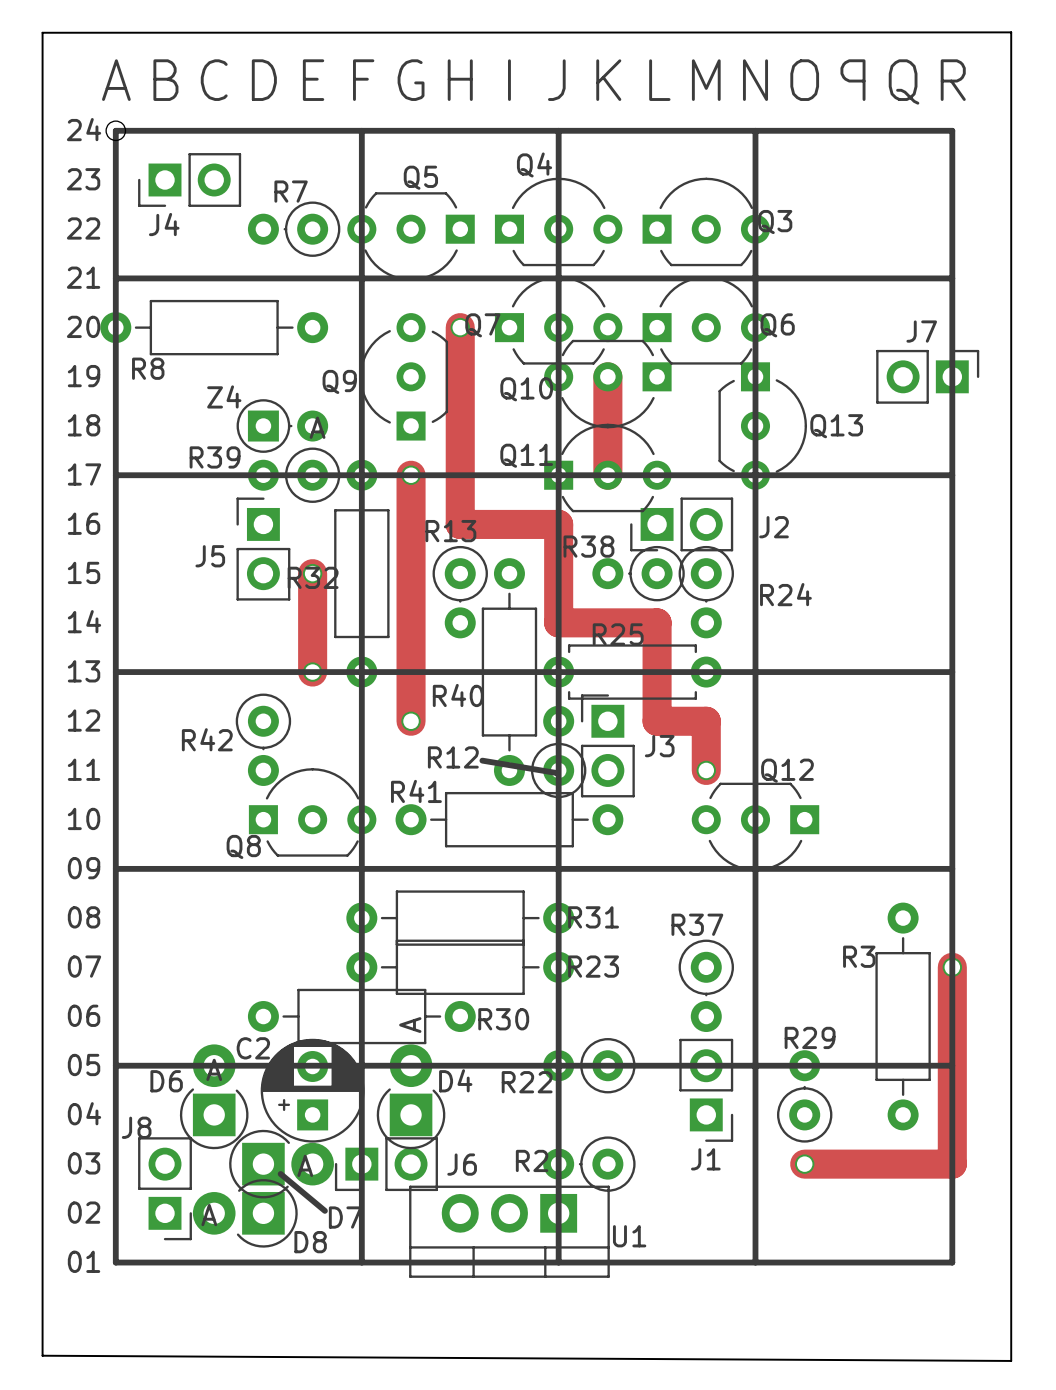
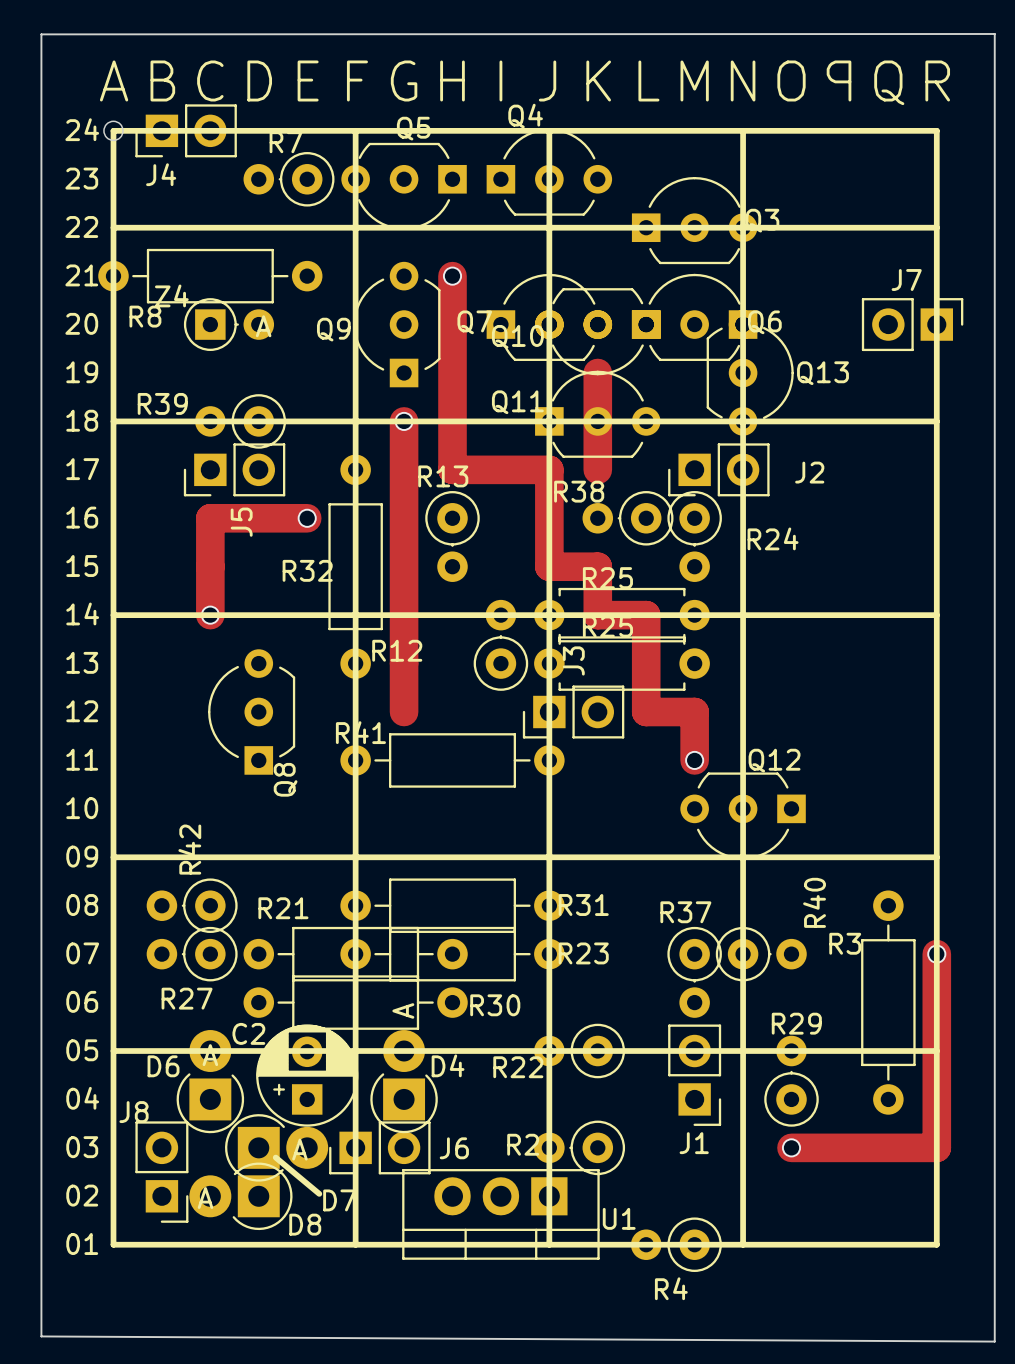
J4 position: (189, 179) -> (186, 130)
Q4 position: (558, 221) -> (549, 172)
R7 position: (294, 229) -> (289, 179)
Q5 position: (411, 236) -> (404, 186)
line: (115, 278) (952, 278) -> (113, 227) (936, 227)
track: none -> (452, 276) (452, 324)
R8 position: (214, 327) -> (210, 276)
via position: (460, 327) -> (452, 276)
Q9 position: (403, 376) -> (396, 324)
J7 position: (927, 376) -> (912, 324)
Q10 position: (607, 384) -> (597, 331)
Z4 position: (282, 426) -> (228, 324)
track: none -> (404, 421) (404, 469)
Q13 position: (762, 426) -> (750, 372)
Q11 position: (607, 467) -> (597, 414)
line: (115, 475) (952, 475) -> (113, 421) (936, 421)
R39 position: (294, 475) -> (240, 421)
via position: (411, 475) -> (404, 421)
track: (460, 475) (460, 524) (558, 524) -> (452, 469) (549, 469) (549, 518)
track: none -> (307, 518) (210, 518) (210, 615)
J2 position: (681, 524) -> (718, 469)
J5 rotation: 0° (263, 549) -> 90° counterclockwise (234, 469)
J5 position: (263, 549) -> (234, 469)
R40 footprint: [481, 558, 538, 786] -> [715, 926, 807, 982]
track: (312, 573) (312, 672) -> none
via position: (312, 573) -> (307, 518)
track: (558, 573) (558, 622) (607, 622) -> (549, 566) (597, 566) (597, 615)
R38 position: (638, 573) -> (628, 518)
R13 position: (460, 592) -> (452, 536)
R24 position: (706, 592) -> (694, 536)
via: none -> (210, 615)
R25: none -> (622, 615)
line: (115, 672) (952, 672) -> (113, 615) (936, 615)
via: (312, 672) -> none
R40 name position: R40 (458, 695) -> R40 (814, 902)
via: (411, 721) -> none
R42 rotation: 0° (263, 739) -> 90° clockwise (192, 905)
R42 position: (263, 739) -> (192, 905)
J3 rotation: 0° (607, 745) -> 90° counterclockwise (573, 712)
R12 position: (558, 751) -> (500, 645)
line: (482, 760) (556, 772) -> none
Q8 rotation: 0° (312, 812) -> 90° counterclockwise (251, 712)
Q8 position: (312, 812) -> (251, 712)
R41 position: (509, 819) -> (452, 760)
R27: none -> (192, 954)
R21: none -> (355, 954)
R4: none -> (676, 1244)

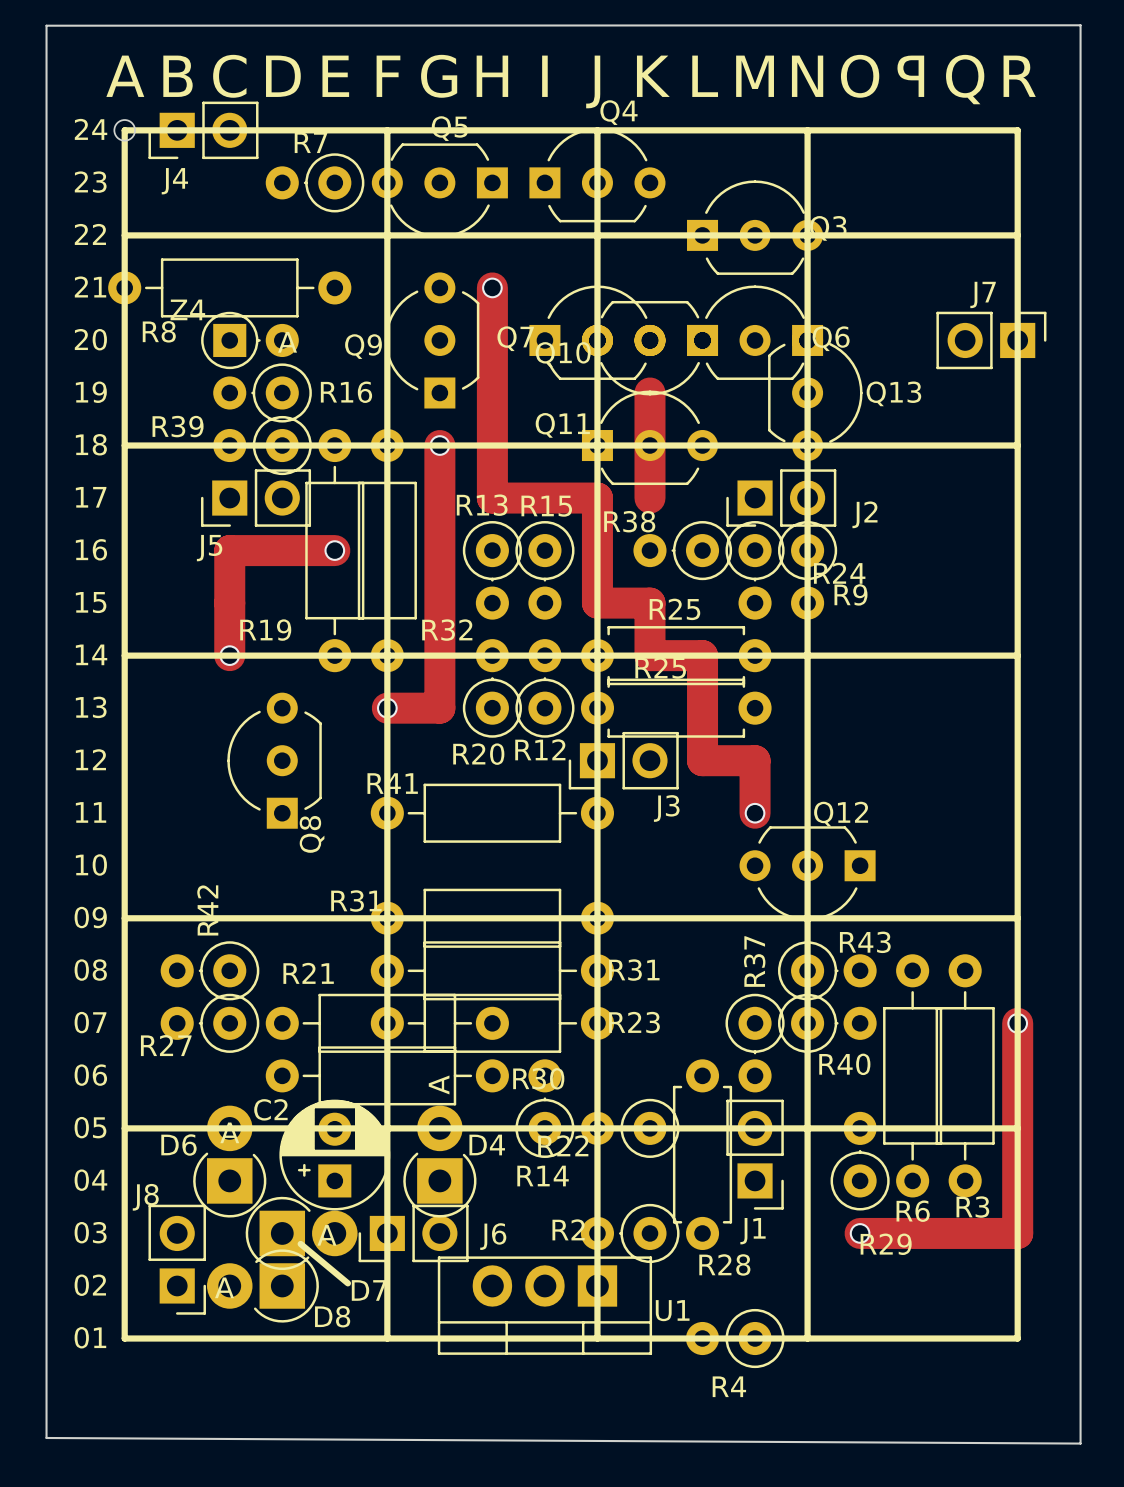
Q4 name position: Q4 (525, 116) -> Q4 (618, 112)
R16: none -> (262, 392)
J2 name position: J2 (809, 472) -> J2 (864, 514)
R19: none -> (334, 550)
J5 name rotation: 0° (241, 522) -> 90° clockwise (209, 548)
J5 name position: J5 (241, 522) -> J5 (209, 548)
R15: none -> (544, 570)
R9: none -> (807, 570)
R32 position: (355, 566) -> (387, 550)
R32 name position: R32 (307, 570) -> R32 (447, 630)
R25 name position: R25 (607, 578) -> R25 (674, 609)
R20: none -> (492, 688)
R12 name position: R12 (397, 650) -> R12 (540, 749)
J3 name rotation: 0° (573, 660) -> 90° clockwise (666, 808)
J3 name position: J3 (573, 660) -> J3 (666, 808)
via: none -> (387, 708)
track: (404, 663) (404, 712) -> (439, 708) (387, 708)
R31: none -> (492, 918)
R40 name rotation: 0° (814, 902) -> 90° clockwise (844, 1064)
R40 name position: R40 (814, 902) -> R40 (844, 1064)
R43: none -> (827, 970)
R37 name rotation: 0° (685, 912) -> 90° counterclockwise (754, 961)
R3 name position: R3 (845, 943) -> R3 (972, 1207)
R27 name position: R27 (187, 998) -> R27 (166, 1045)
R6: none -> (912, 1075)
R29 name position: R29 (796, 1023) -> R29 (886, 1244)
R14: none -> (544, 1108)
R28: none -> (702, 1154)

